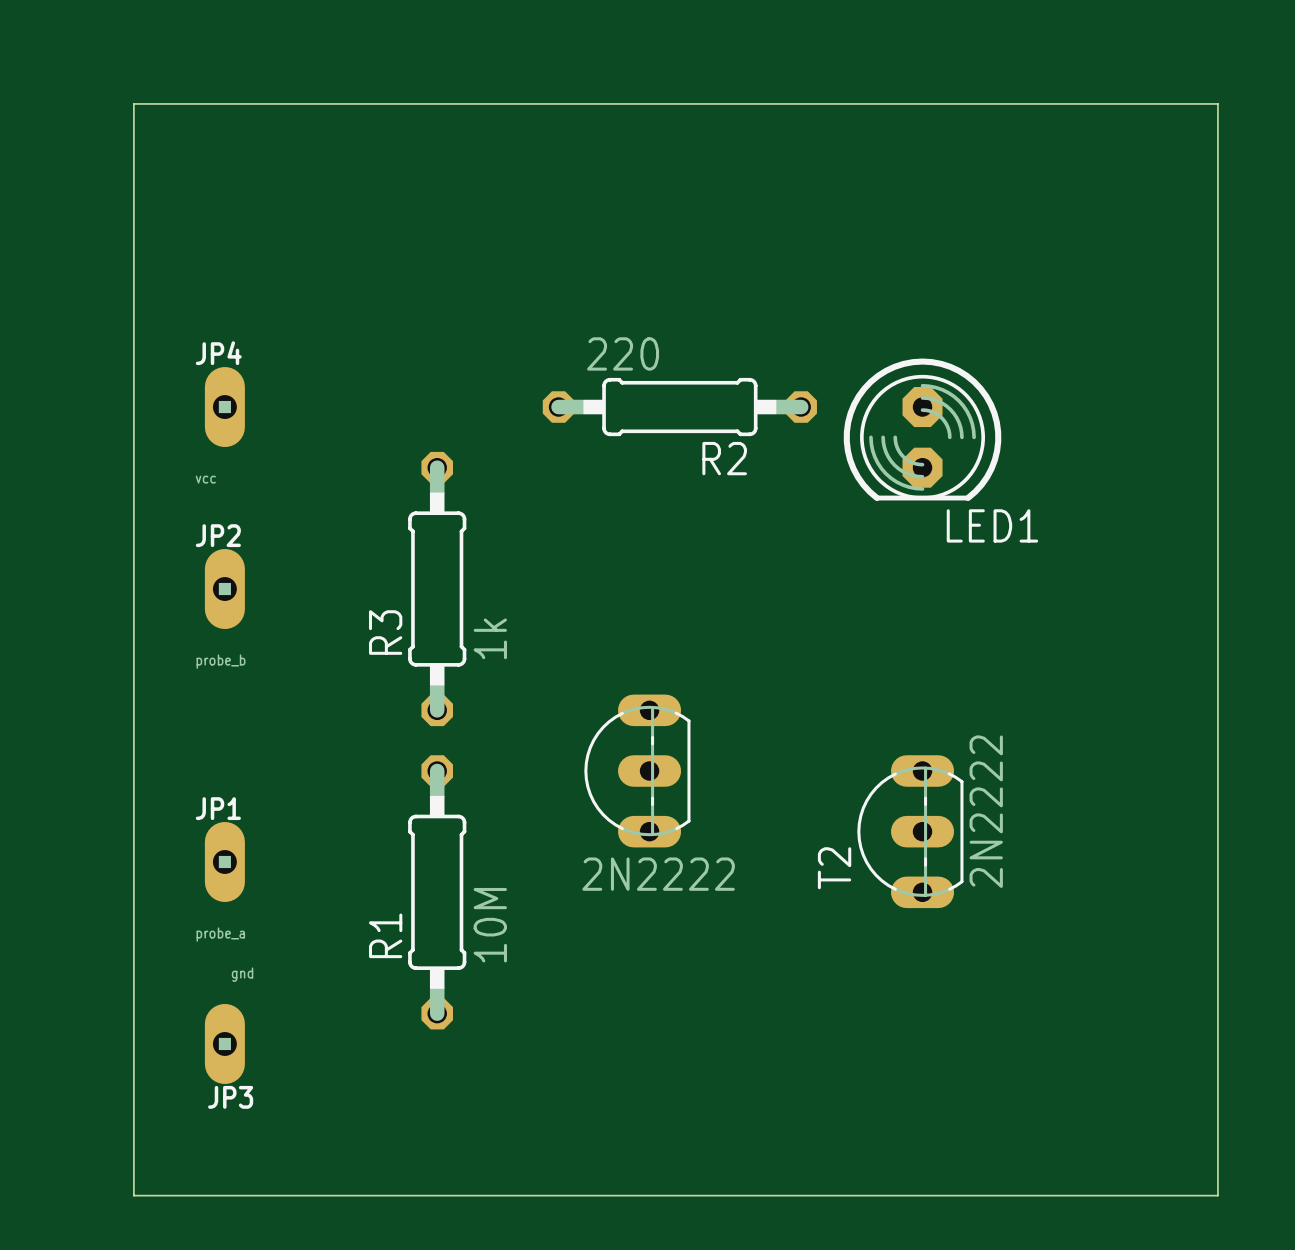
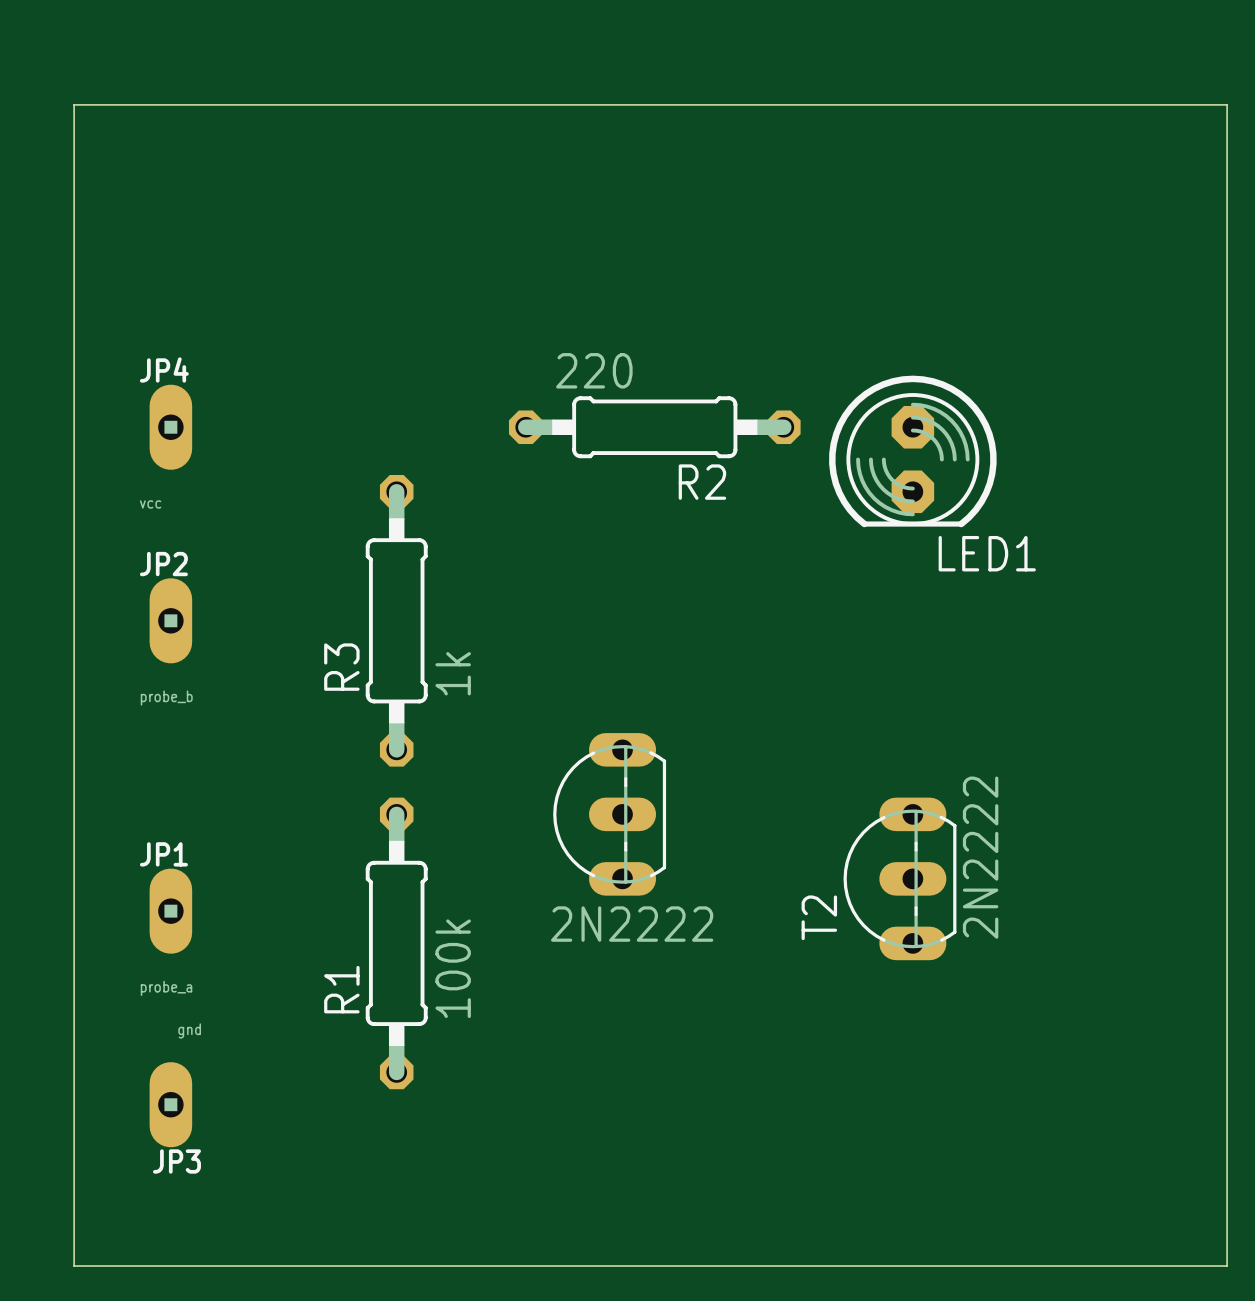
R1 value: 10M (490, 925) -> 100k (453, 968)

